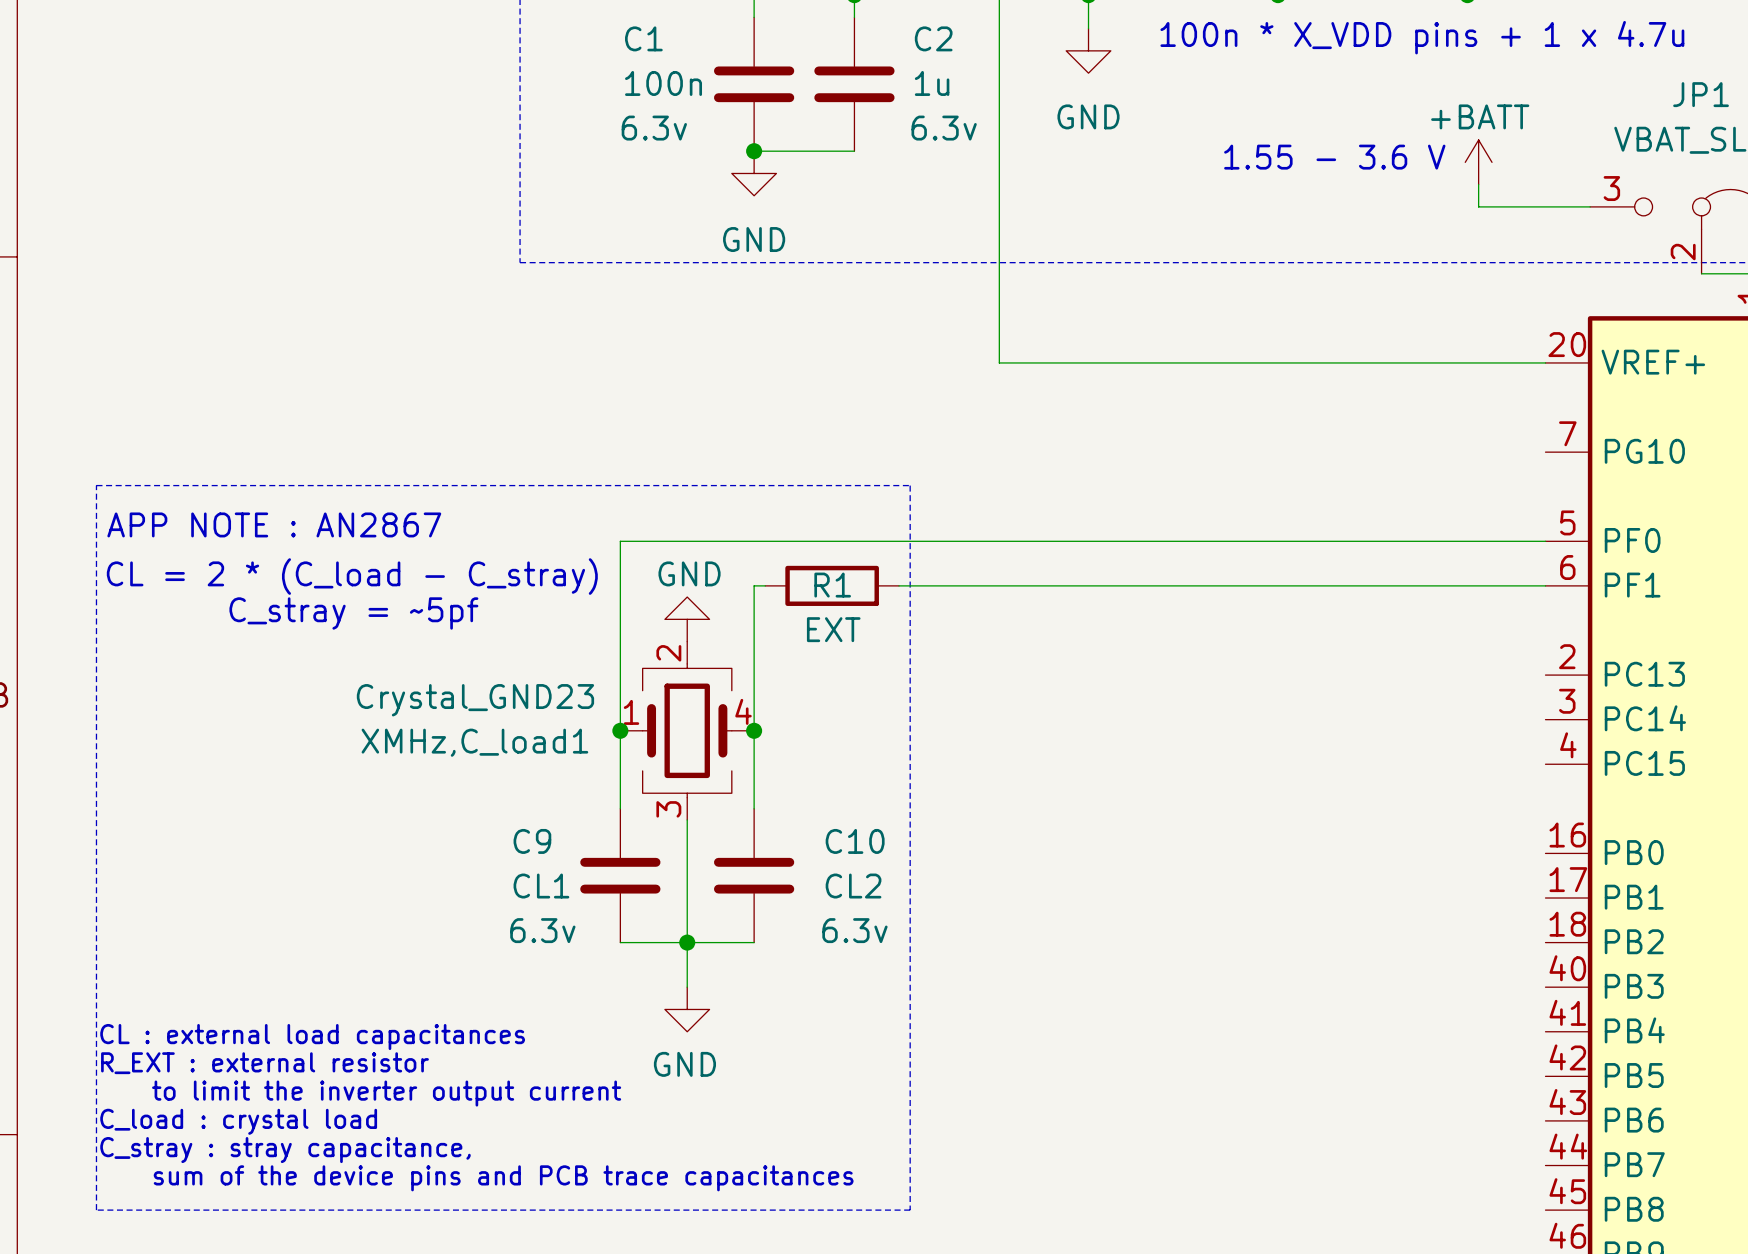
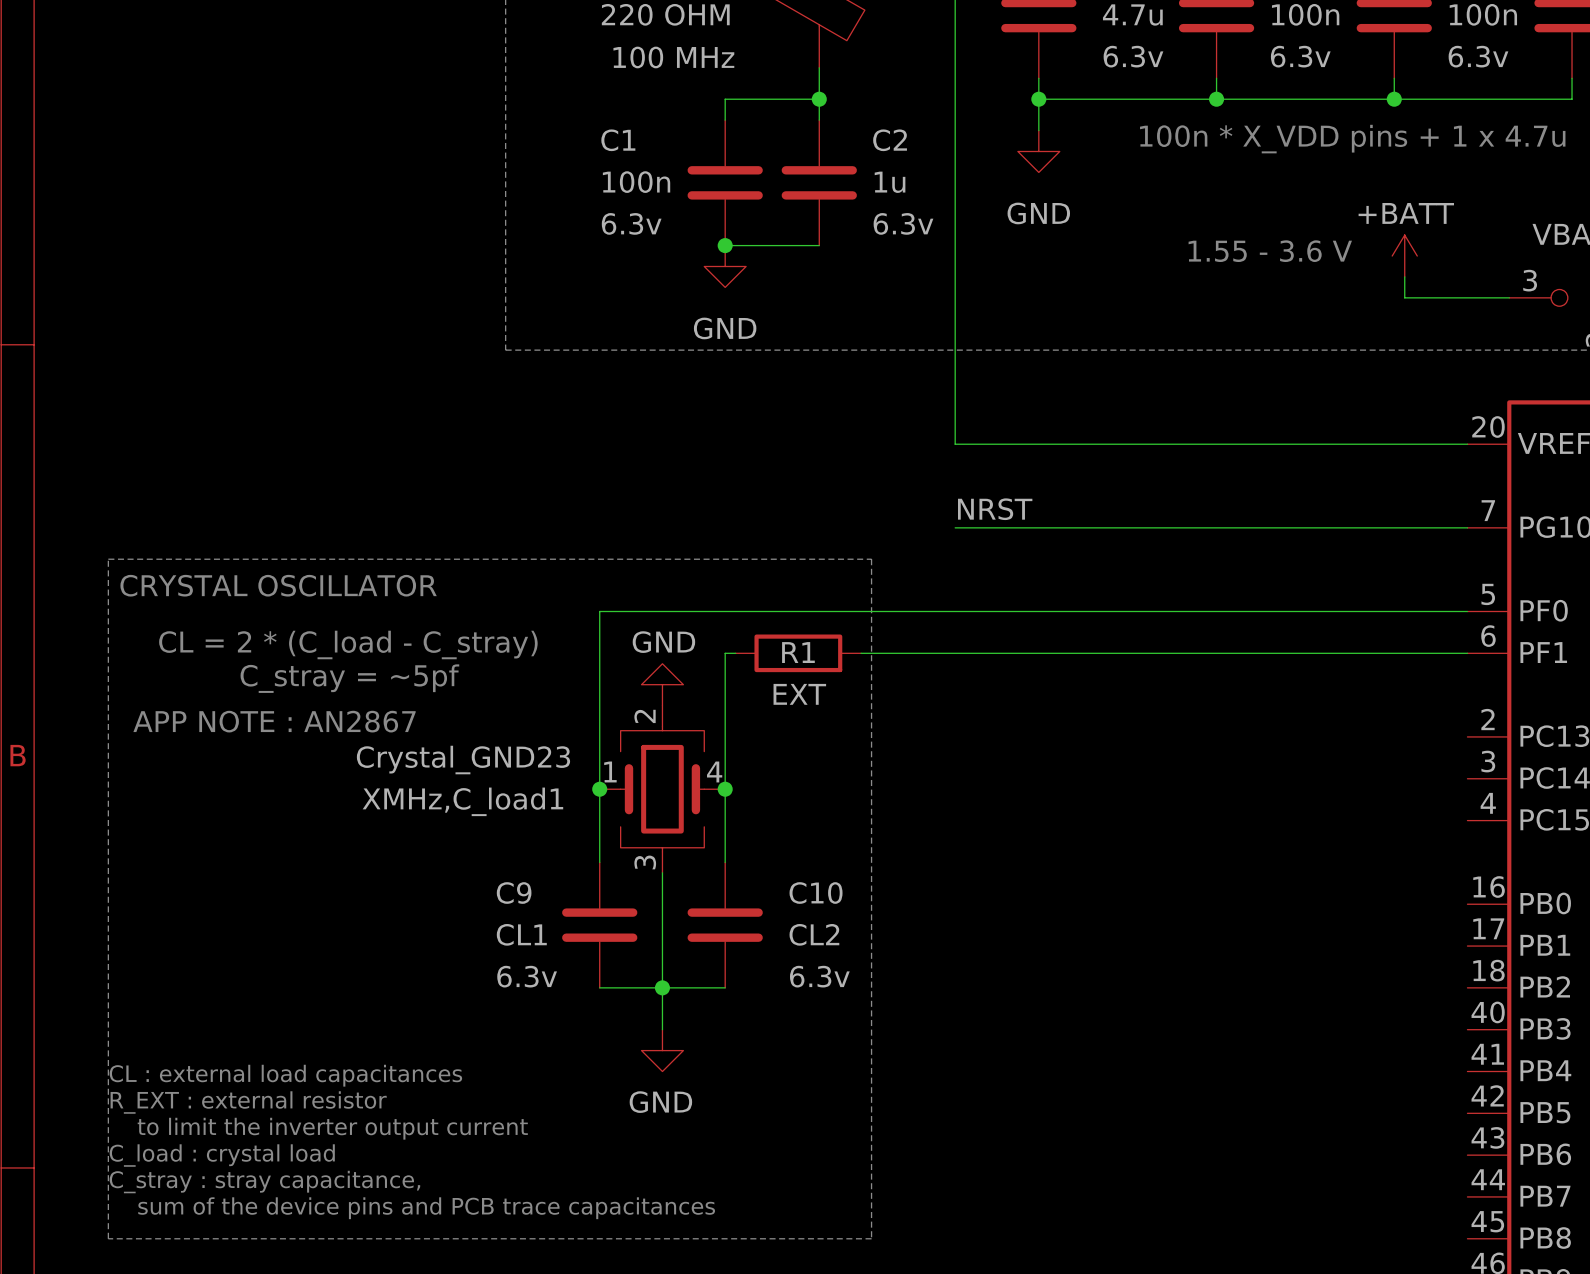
label: none -> NRST (995, 509)
wire: none -> (955, 527) (1467, 527)
text: none -> CRYSTAL OSCILLATOR (278, 585)
text position: APP NOTE : AN2867 (274, 524) -> APP NOTE : AN2867 (274, 721)

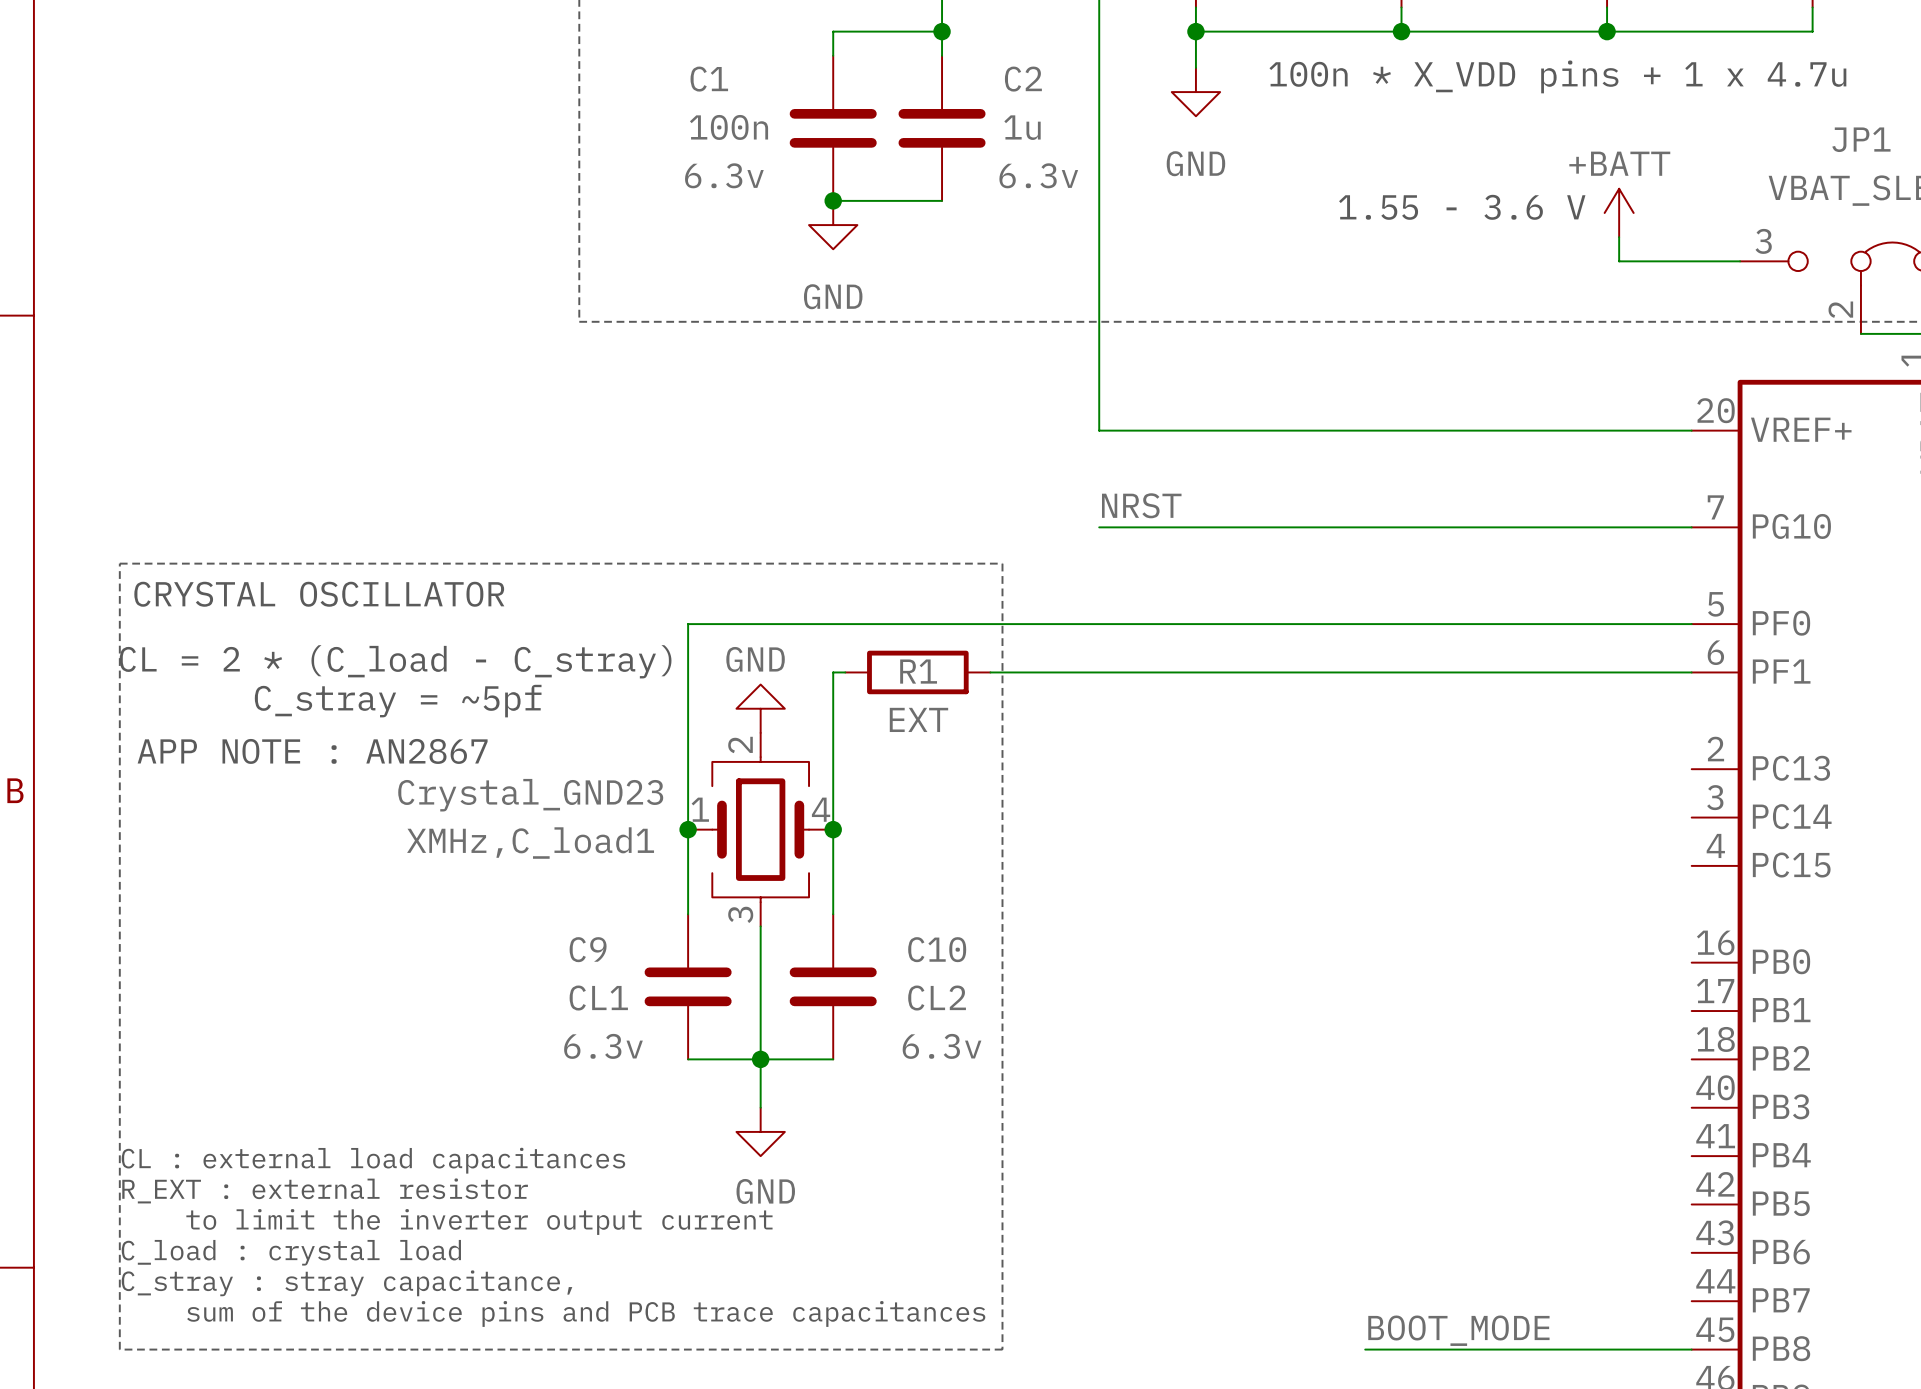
label: none -> BOOT_MODE (1458, 1330)
wire: none -> (1365, 1349) (1691, 1349)

